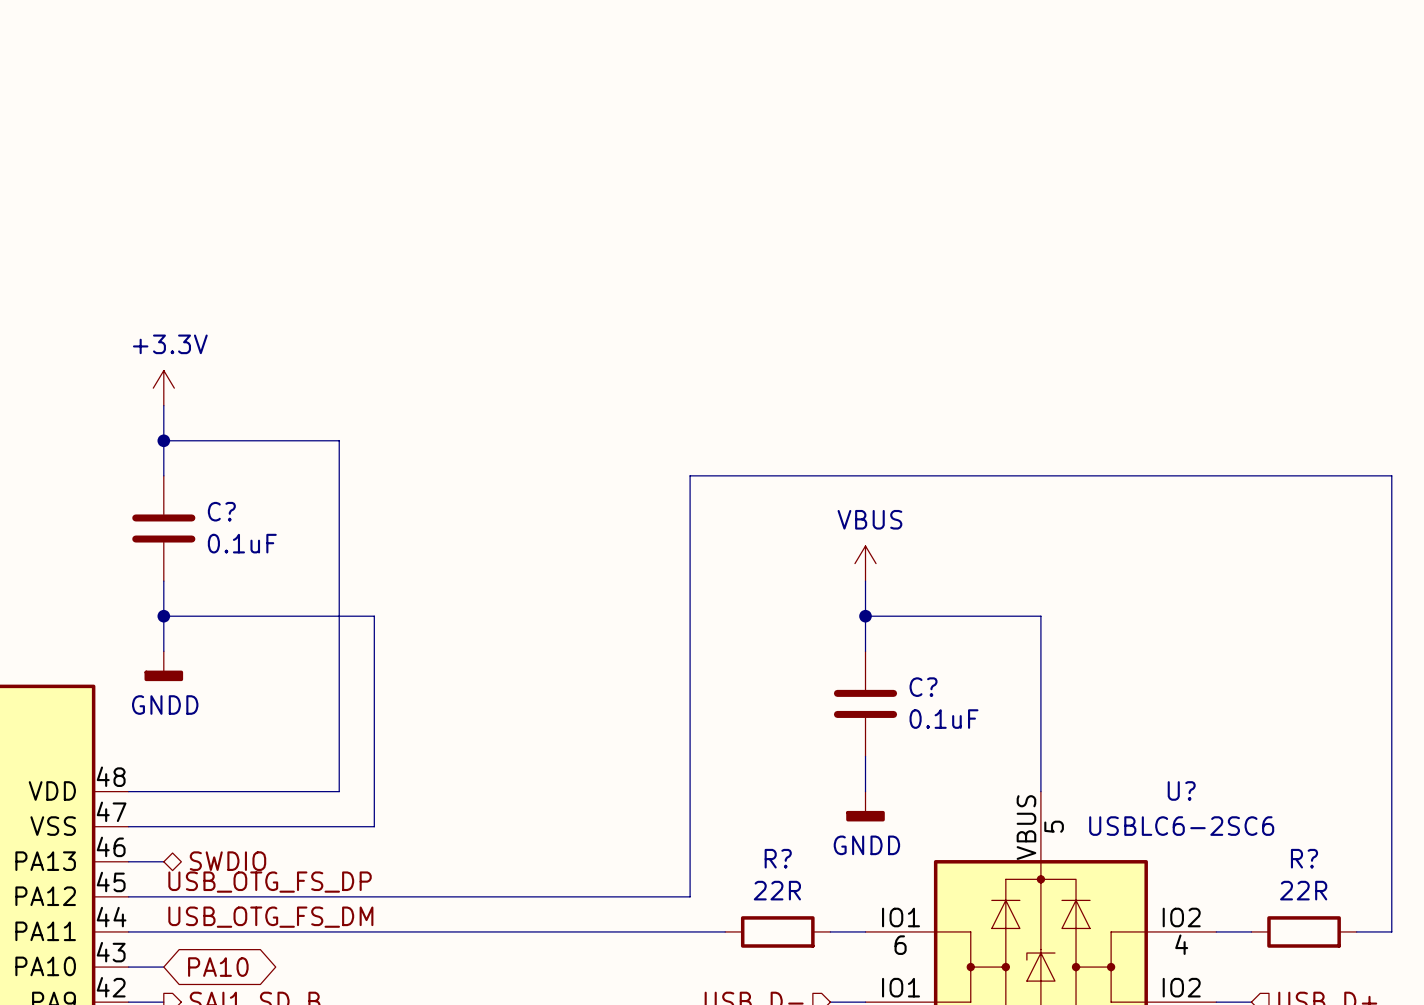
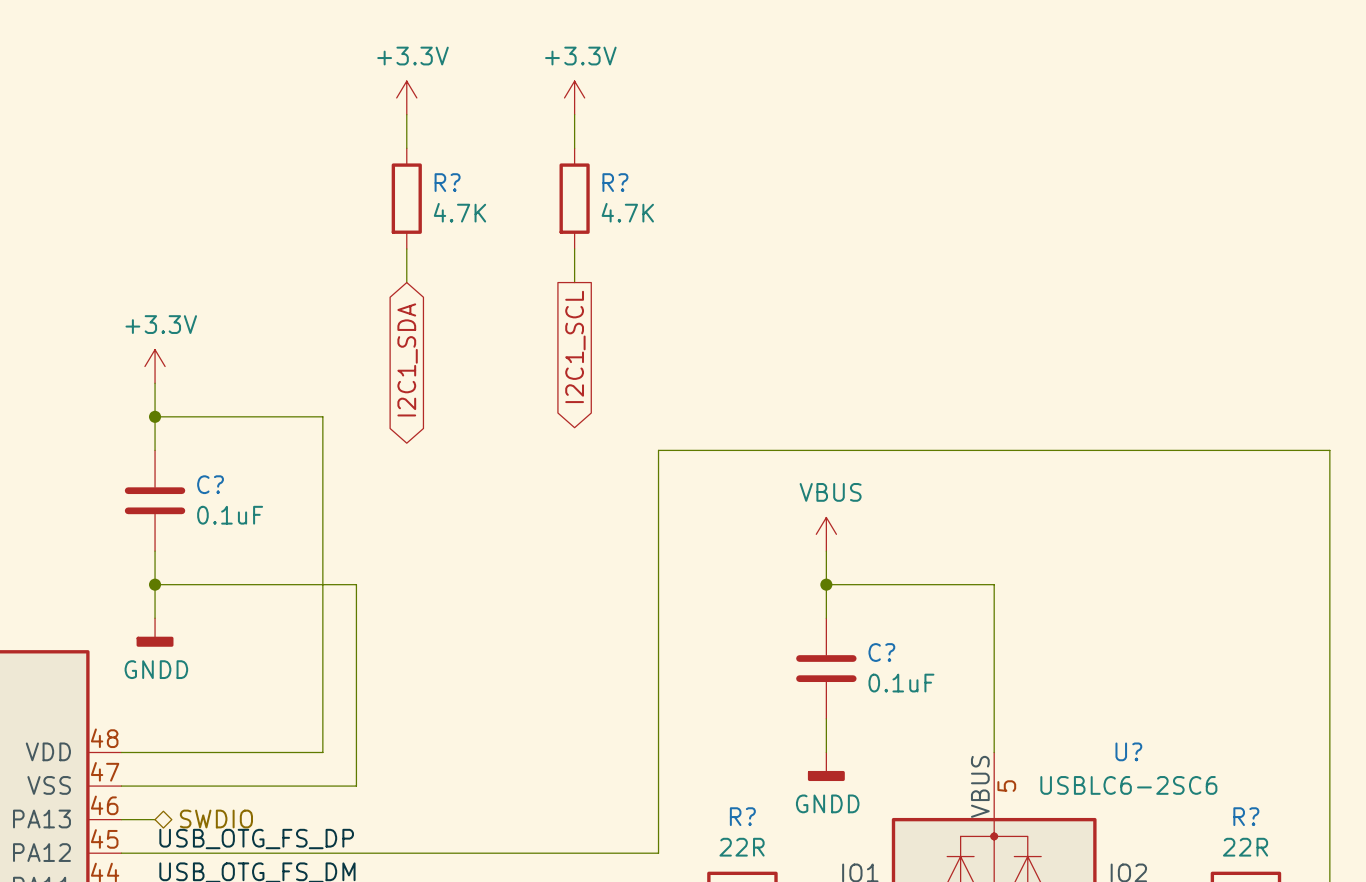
power symbol: none -> +3.3V (406, 97)
power symbol: none -> +3.3V (574, 97)
wire: none -> (406, 114) (406, 148)
wire: none -> (574, 114) (574, 148)
R?: none -> 4.7K (406, 198)
R?: none -> 4.7K (574, 198)
wire: none -> (406, 249) (406, 282)
wire: none -> (574, 249) (574, 282)
global label: none -> I2C1_SCL (575, 346)
global label: none -> I2C1_SDA (407, 359)

